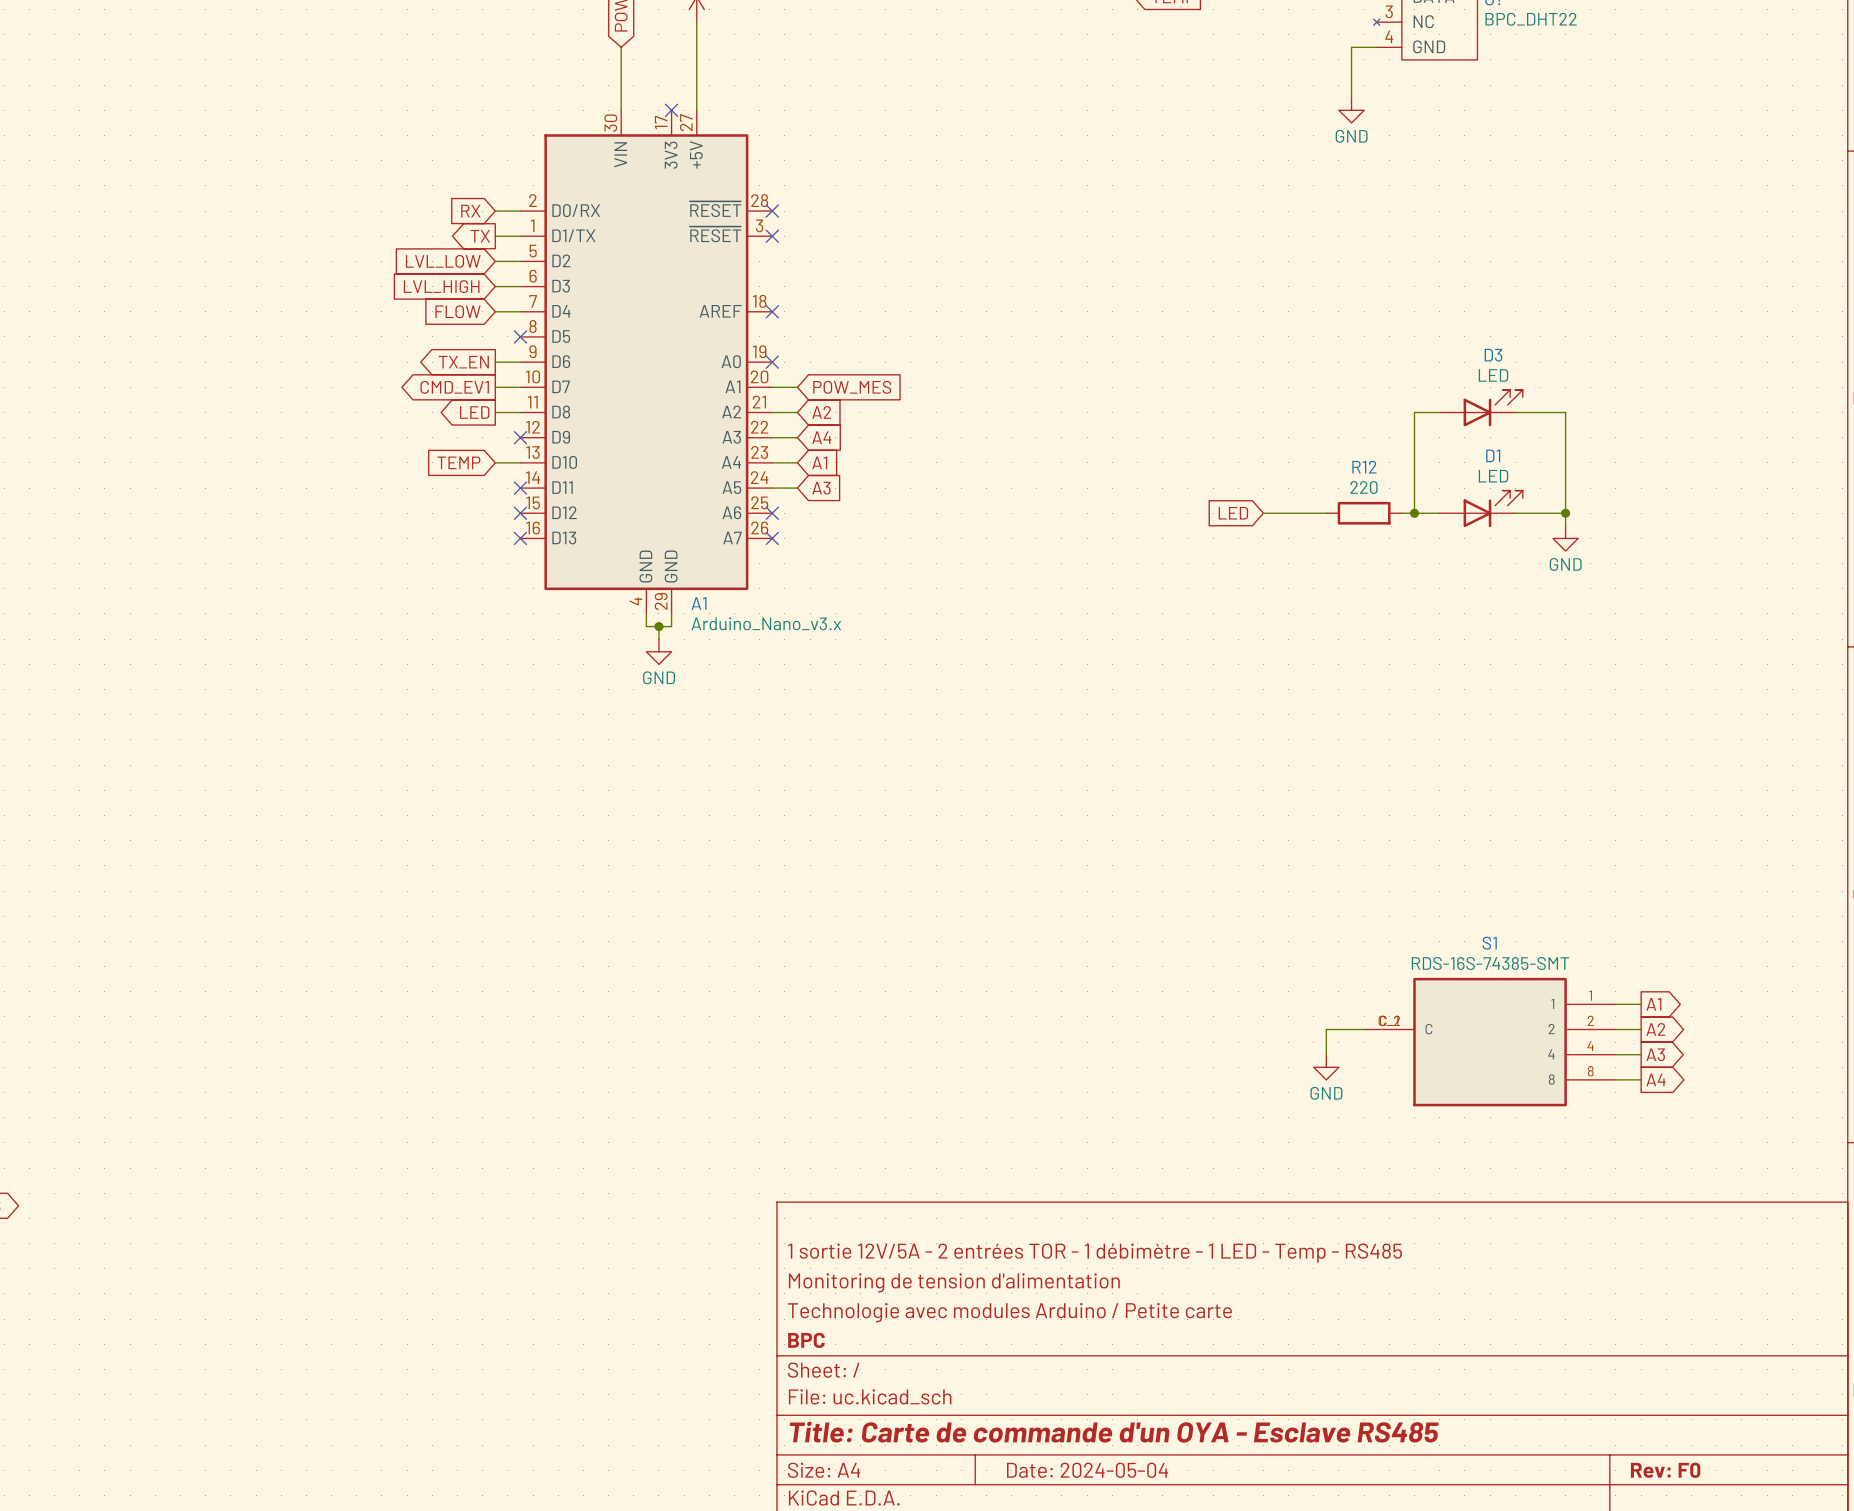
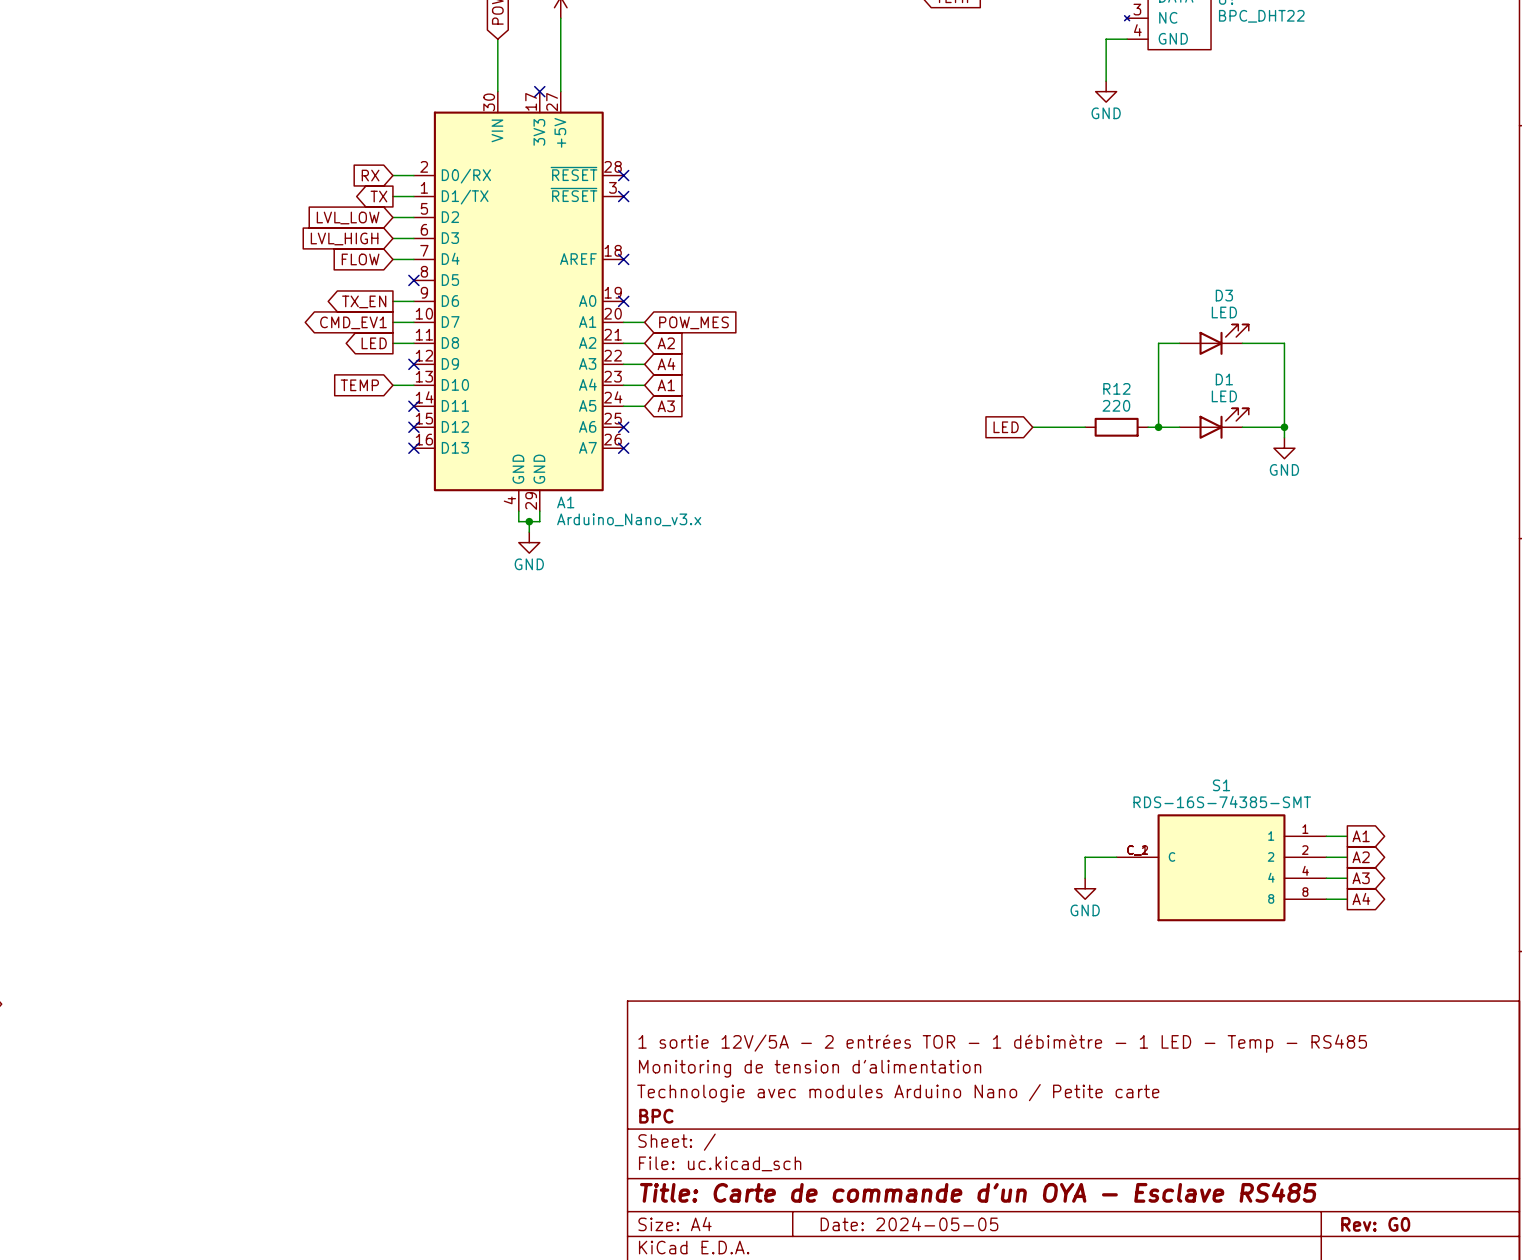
title block: Technologie avec modules Arduino / Petite carte (1009, 1312) -> Technologie avec modules Arduino Nano / Petite carte (898, 1093)
title block: Date: 2024-05-04 (1087, 1470) -> Date: 2024-05-05 (909, 1224)
title block: Rev: F0 (1665, 1470) -> Rev: G0 (1375, 1224)

